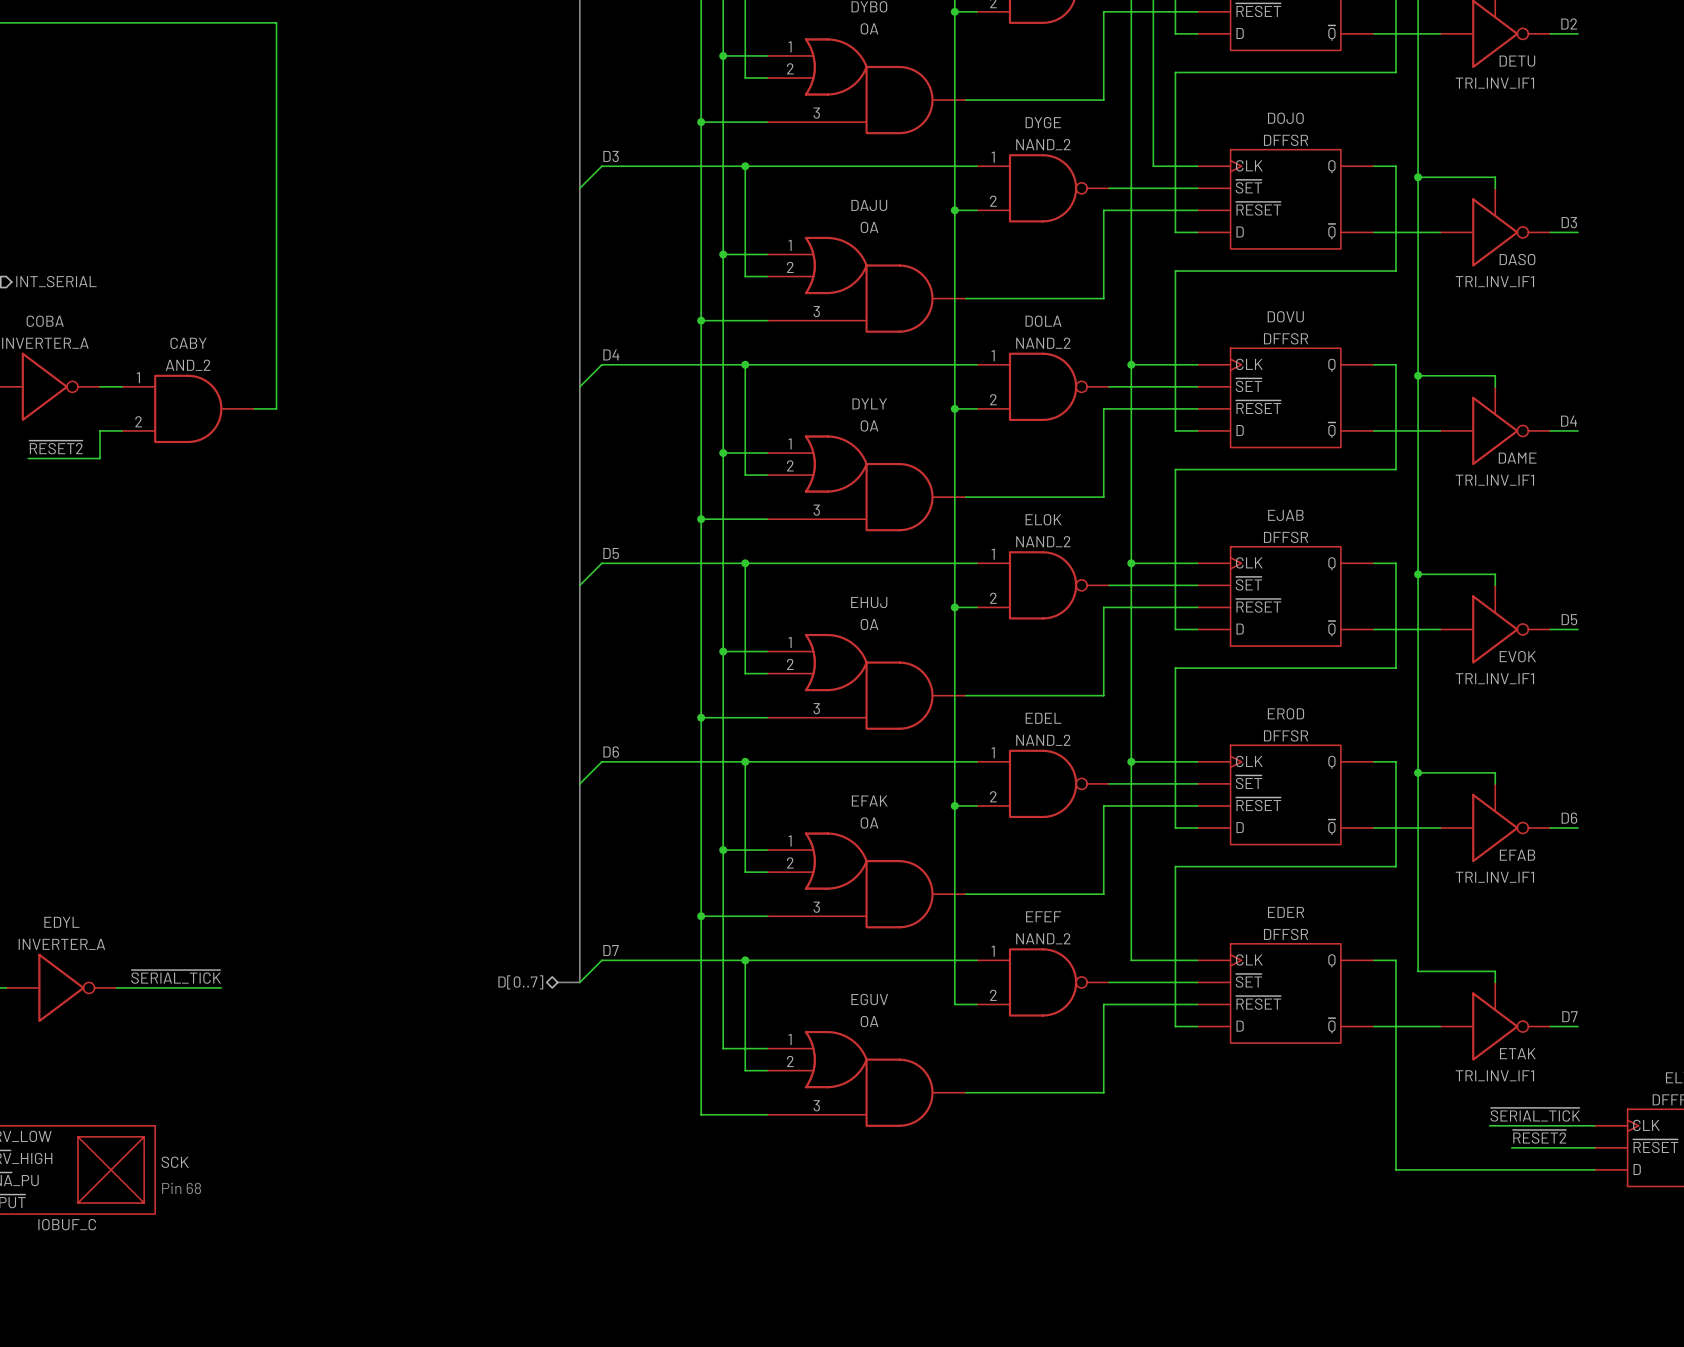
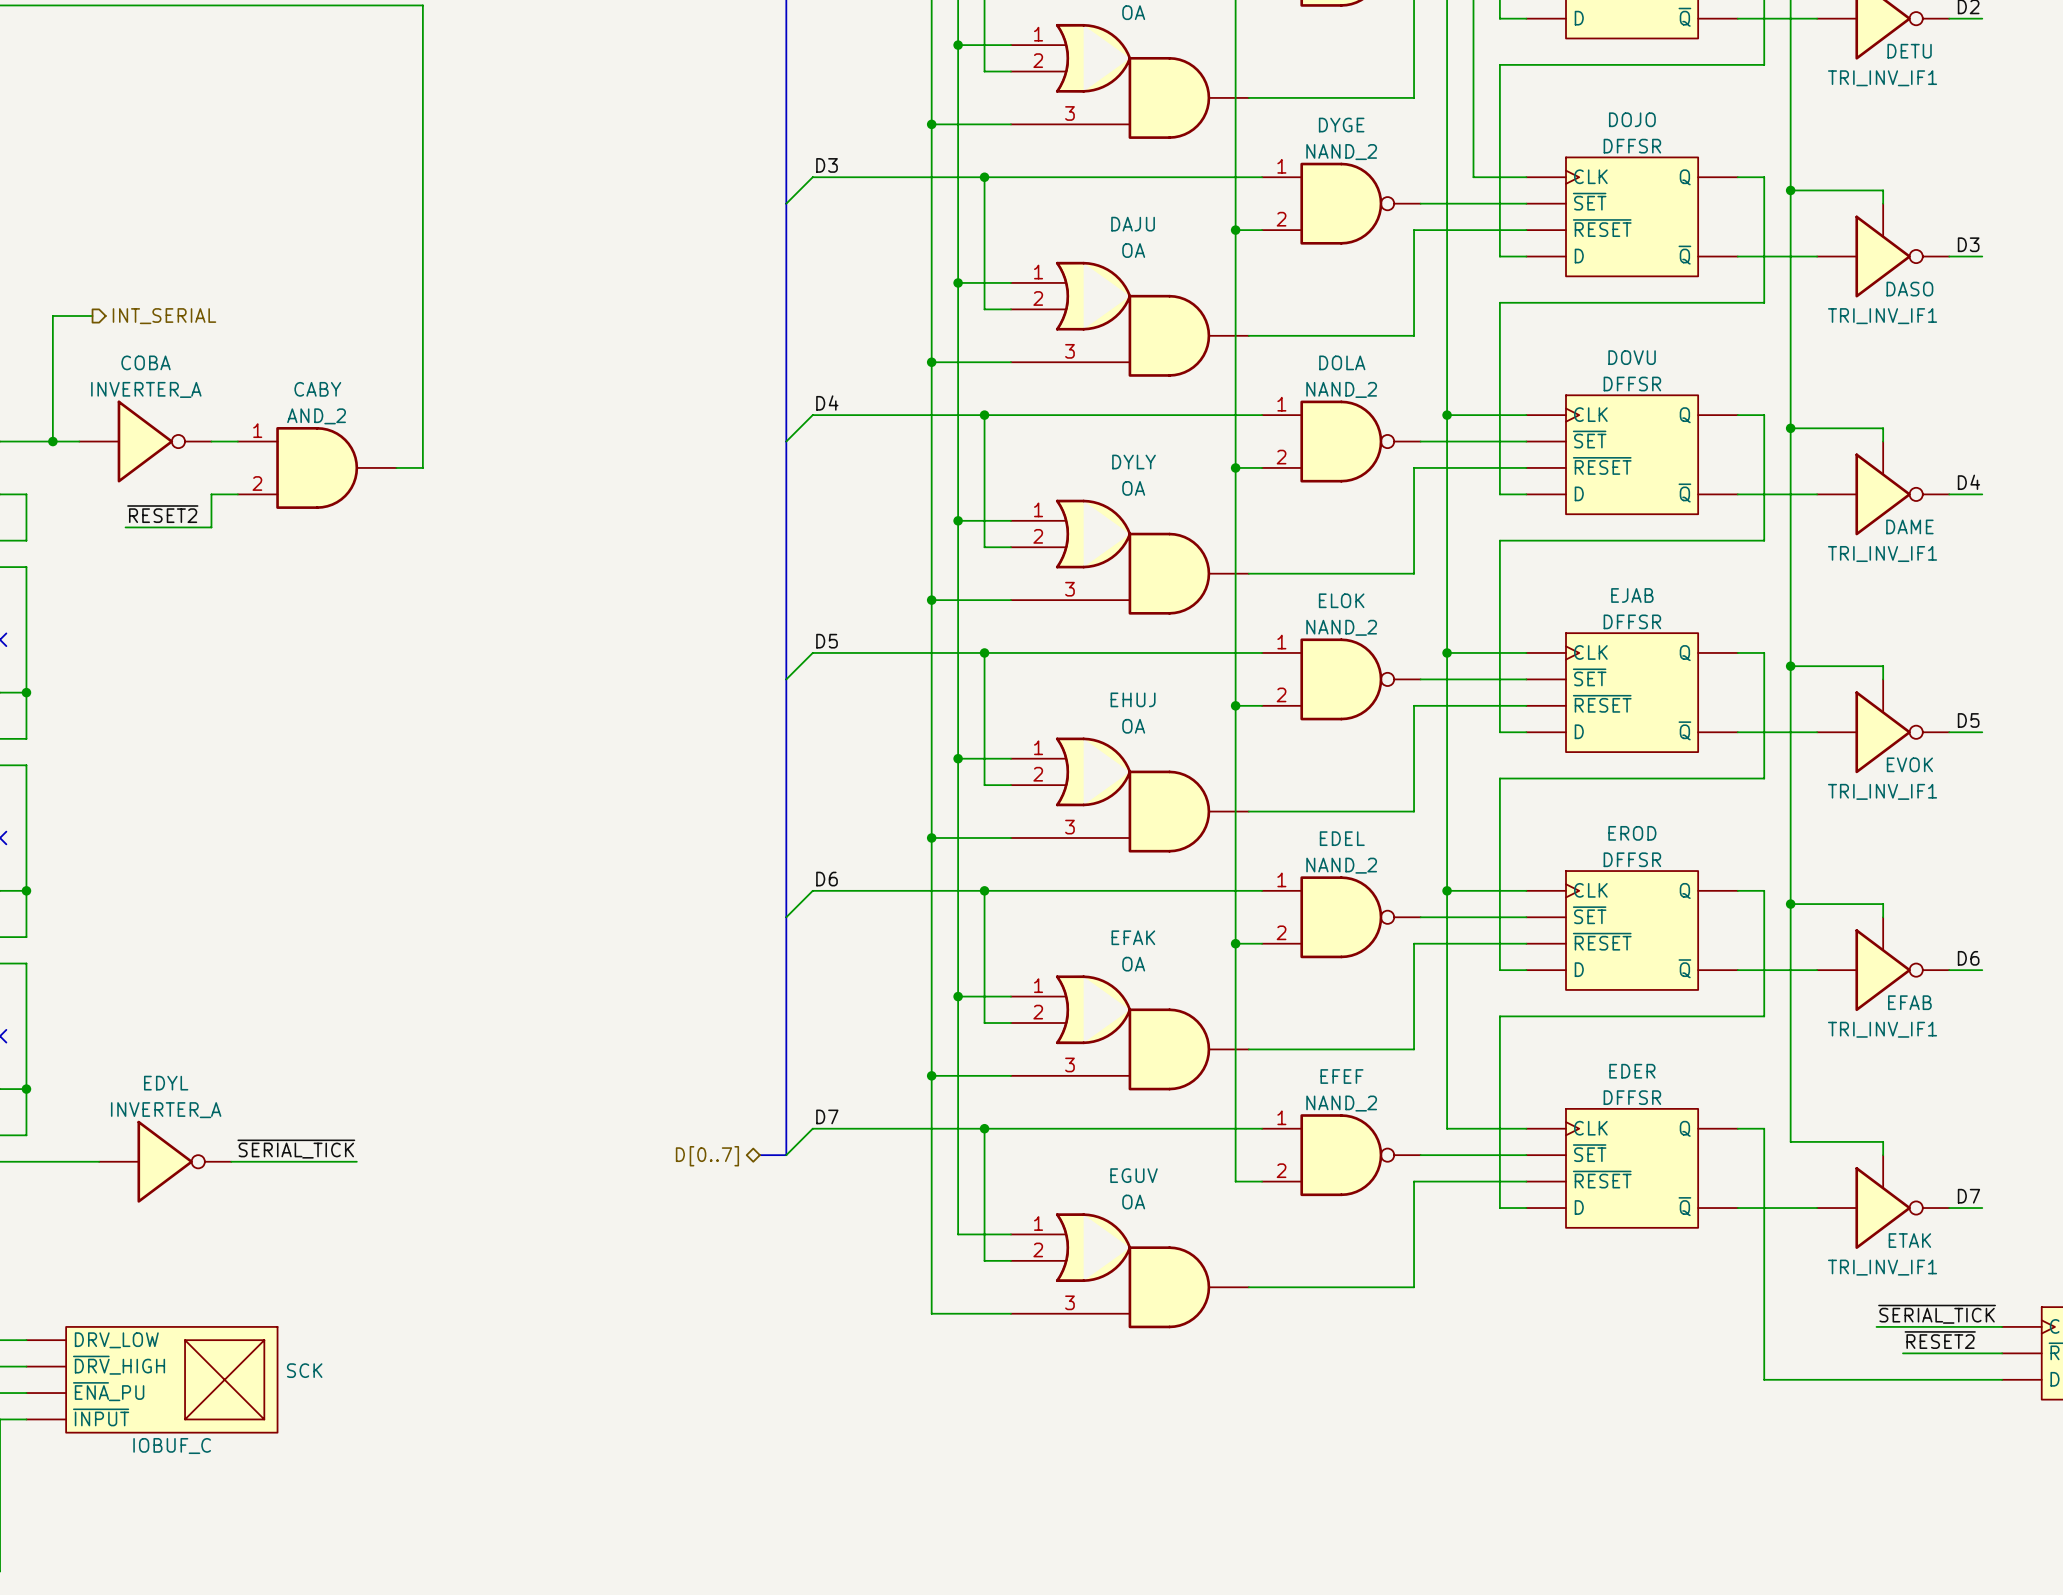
text: Pin 68 (181, 1188) -> none

